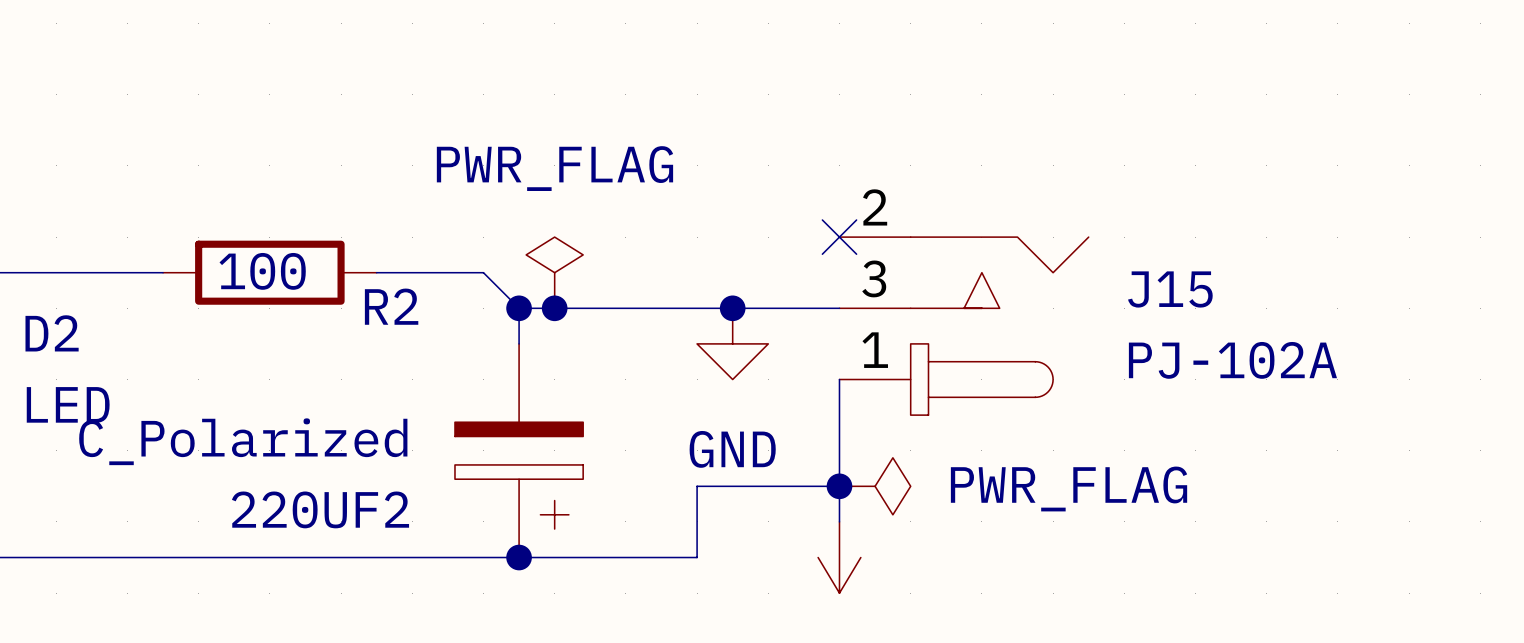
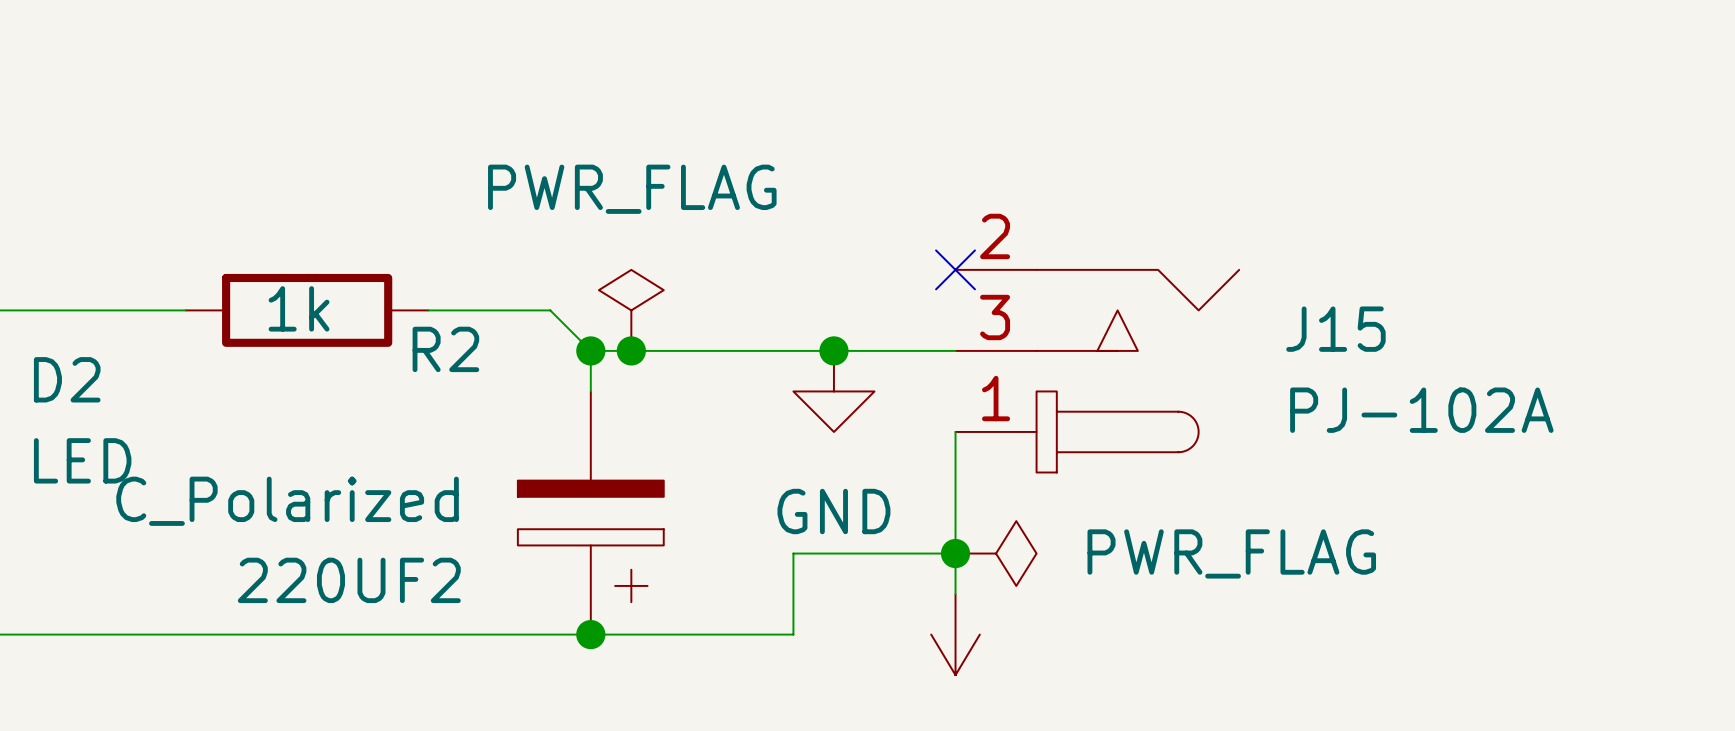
R2 value: 100 (262, 271) -> 1k (299, 308)

